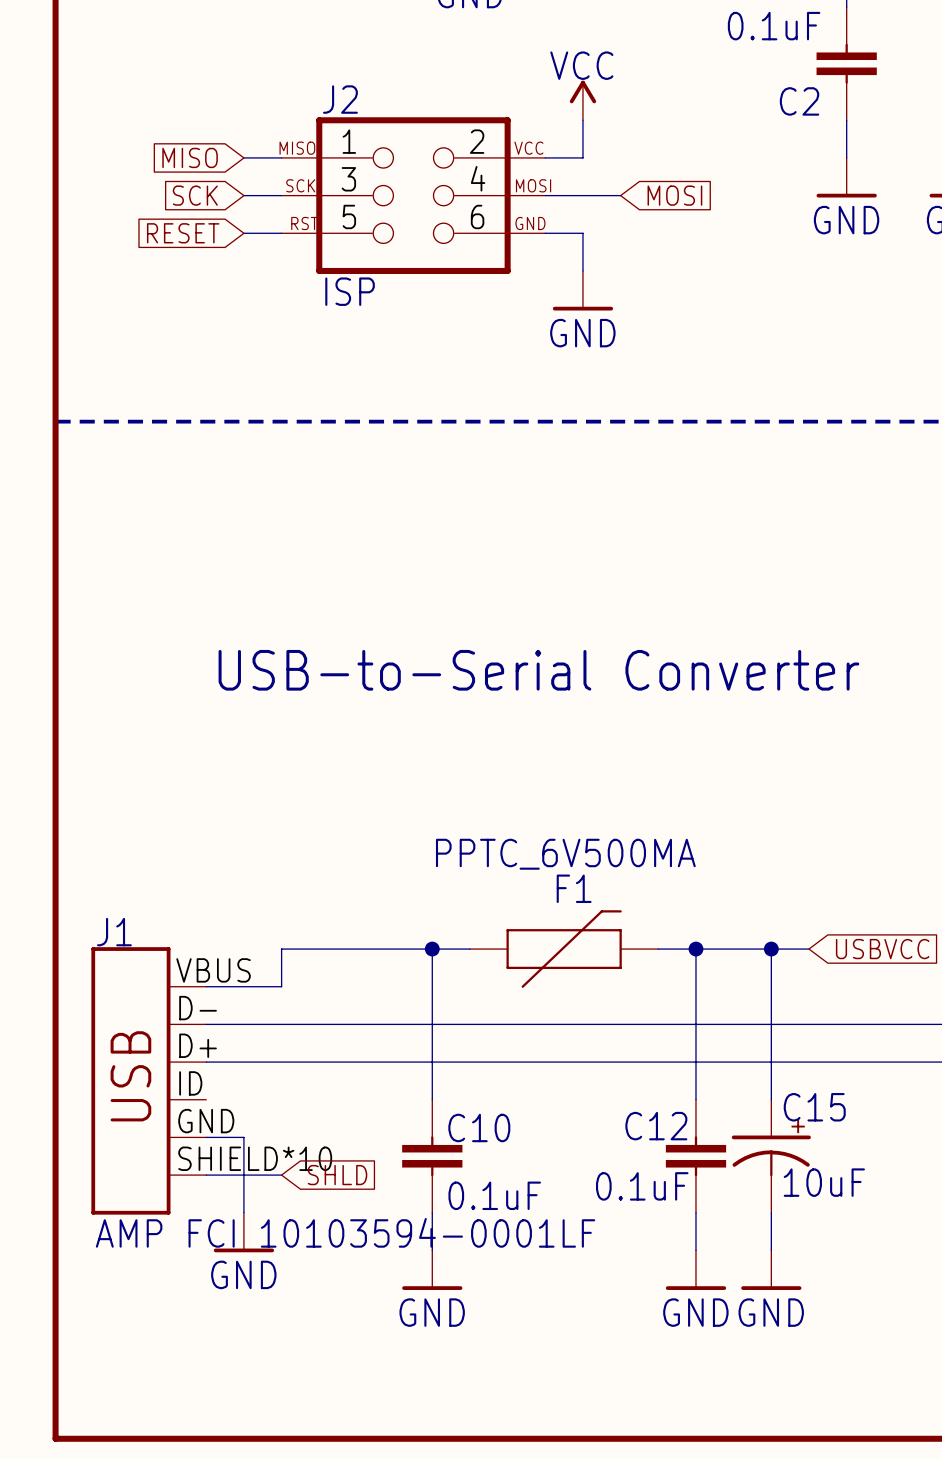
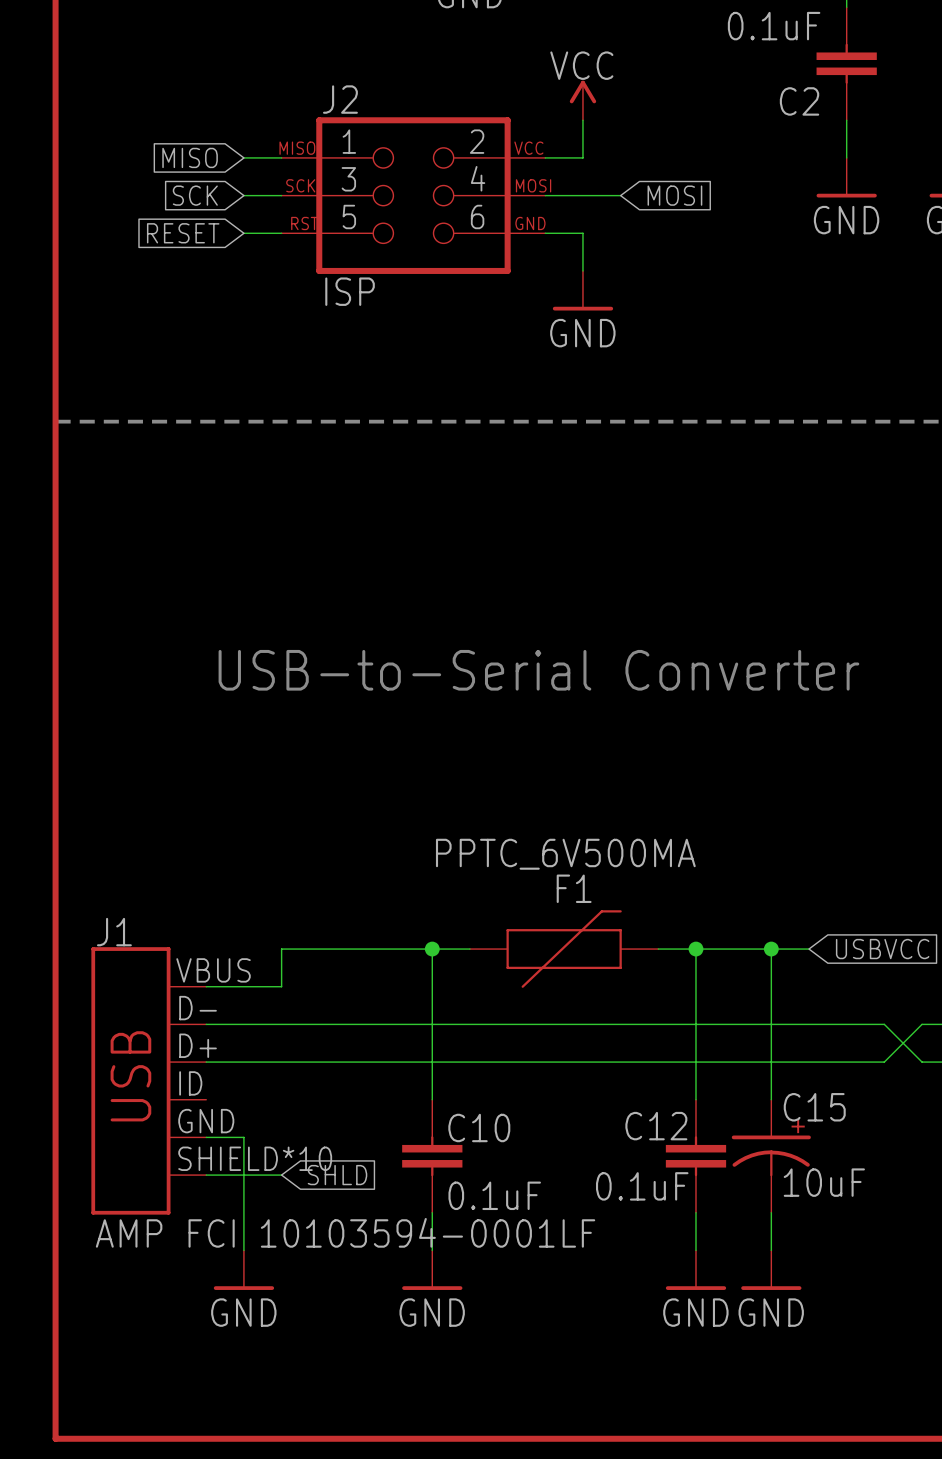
wire: (884, 1024) (922, 1024) -> (884, 1024) (922, 1062)
wire: (884, 1062) (922, 1062) -> (884, 1062) (922, 1024)
power symbol position: GND (243, 1232) -> GND (243, 1270)

